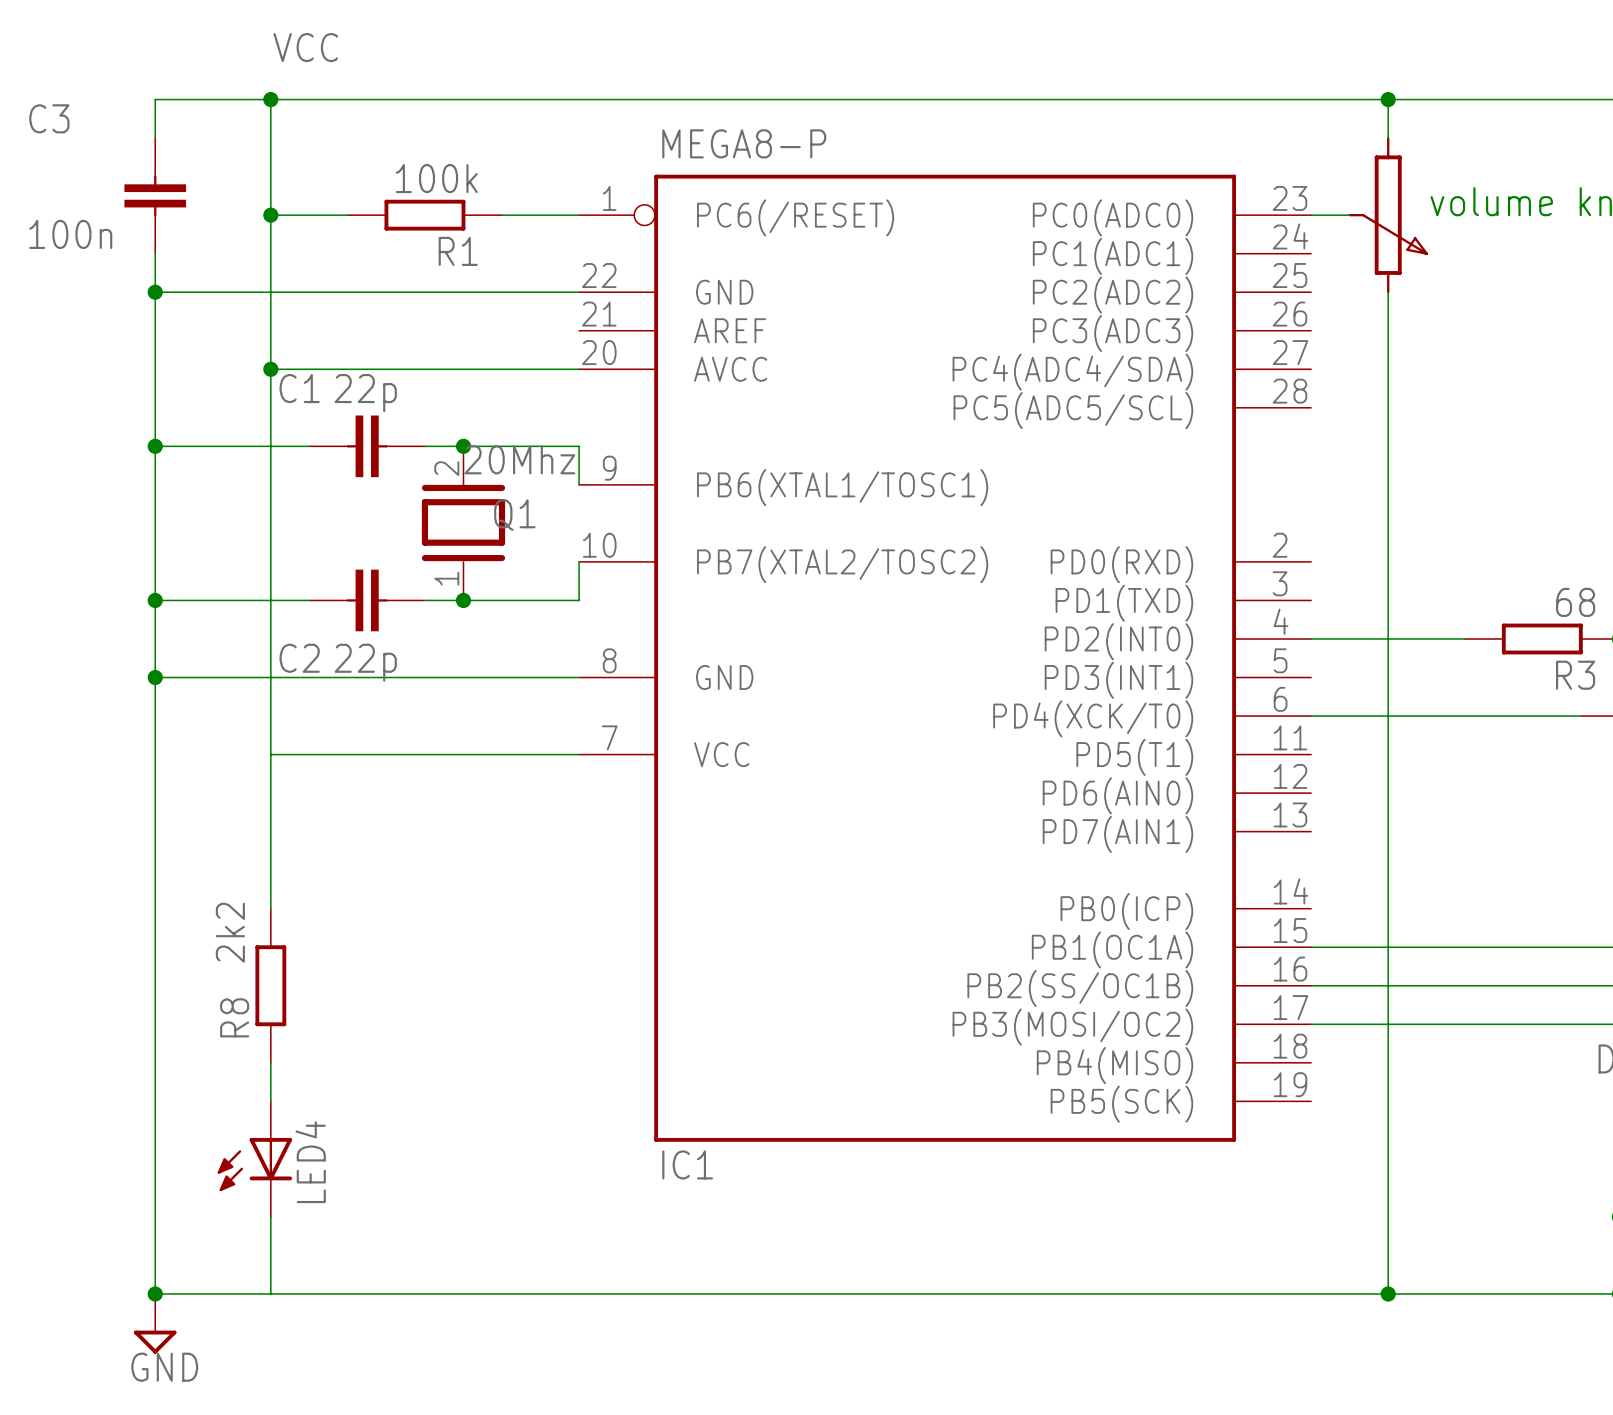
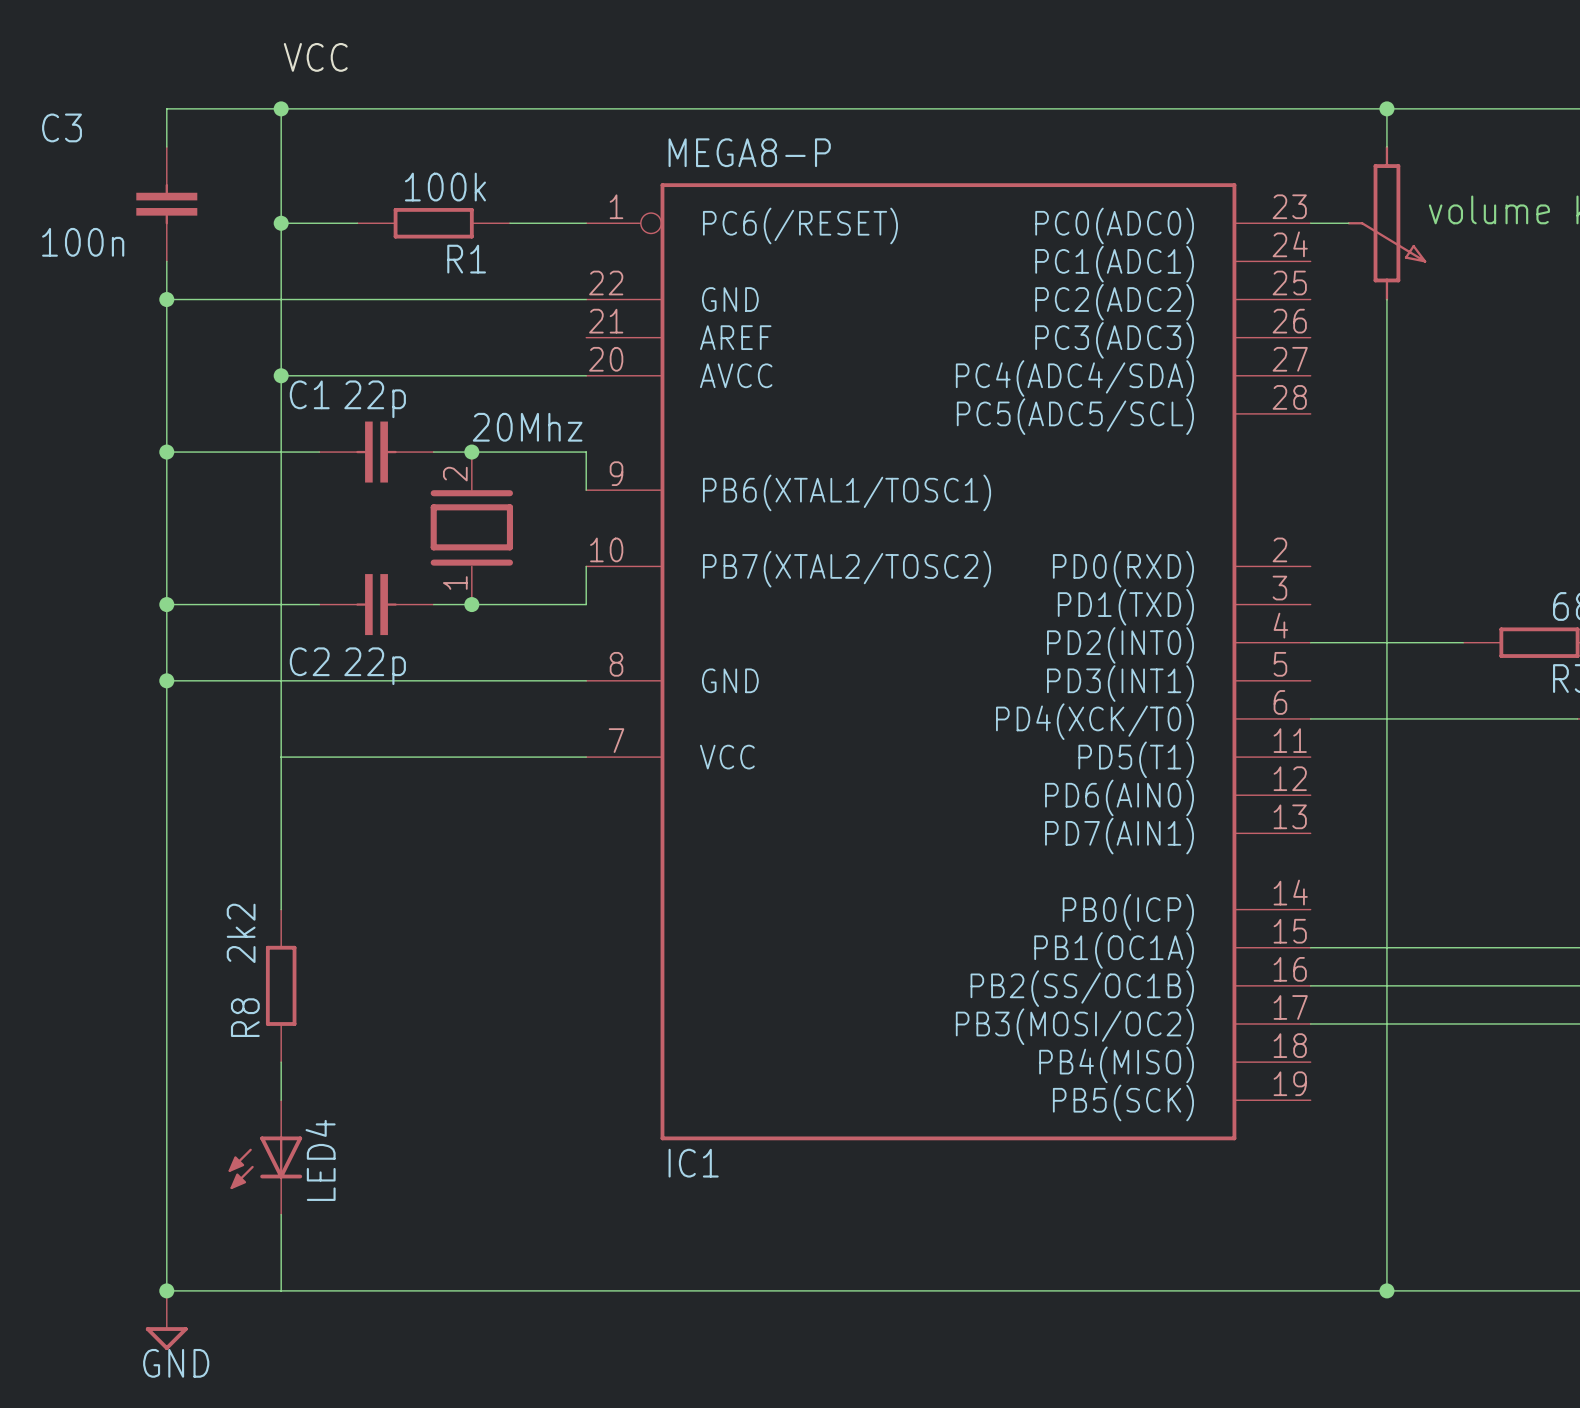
Q1 value position: 20Mhz (519, 459) -> 20Mhz (527, 427)
Q1 name: Q1 (514, 515) -> none

